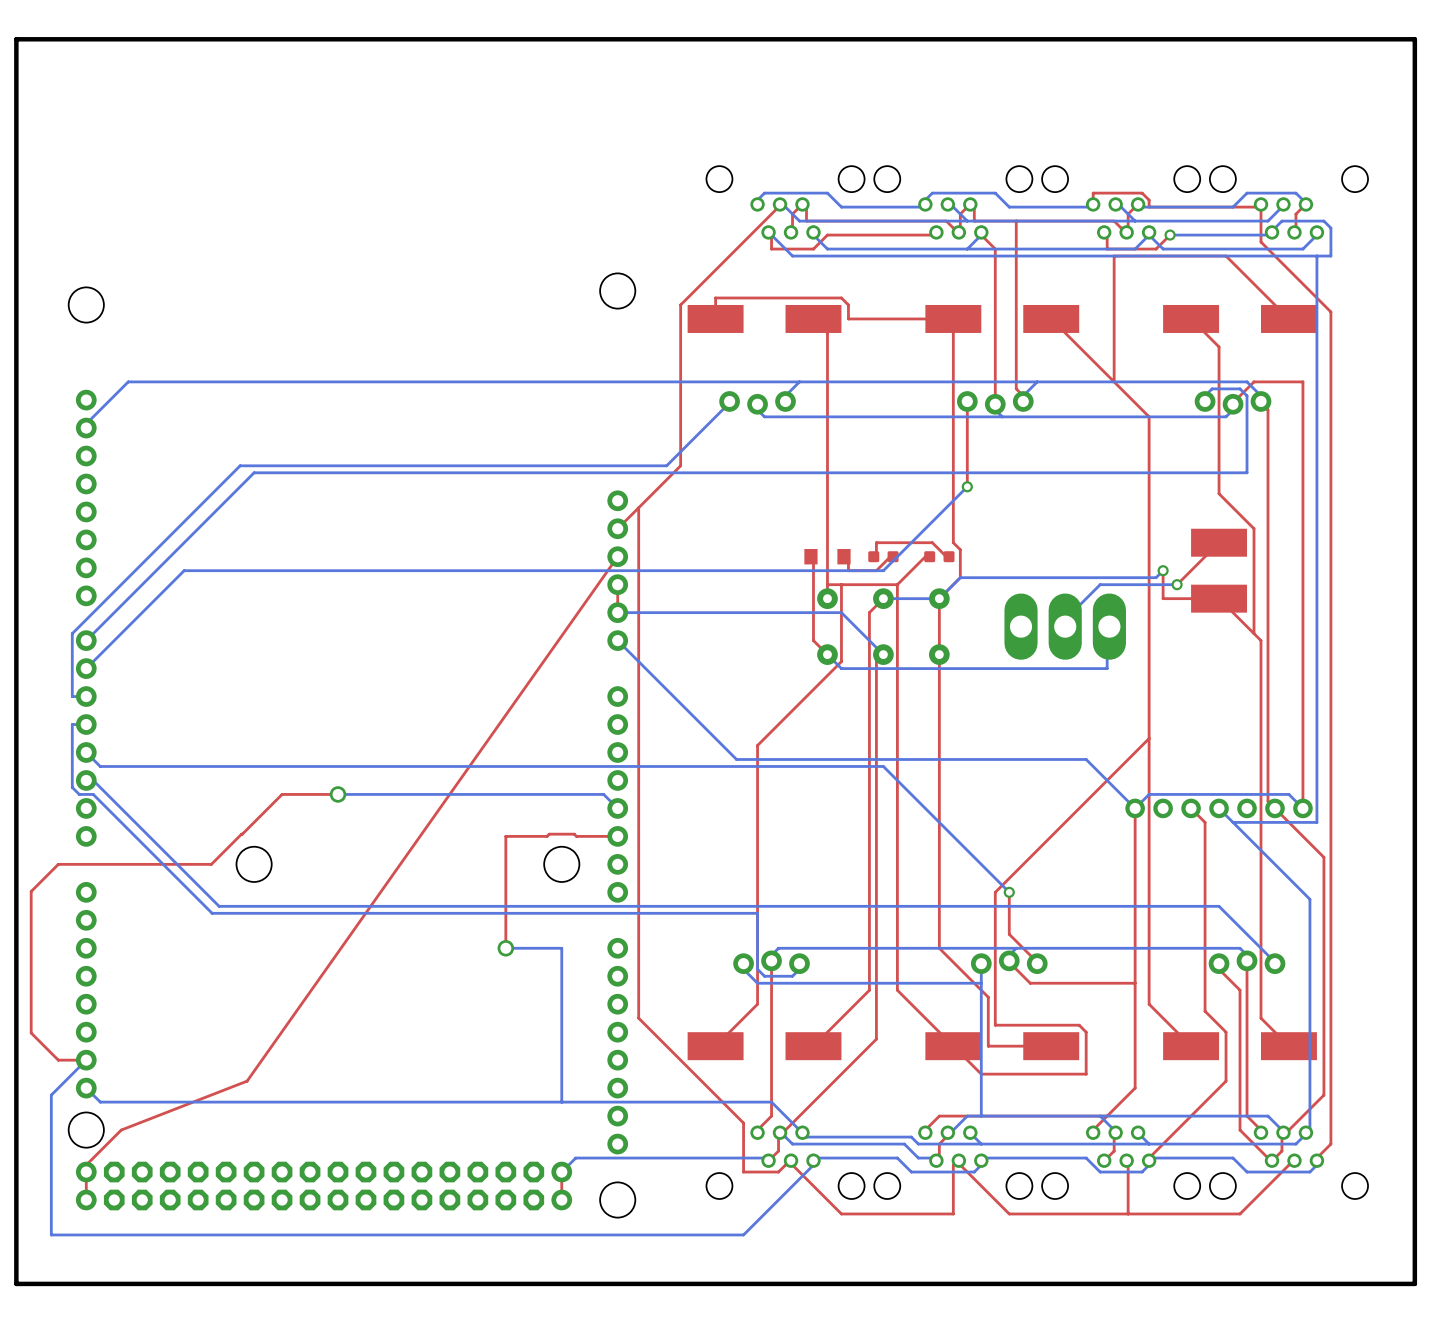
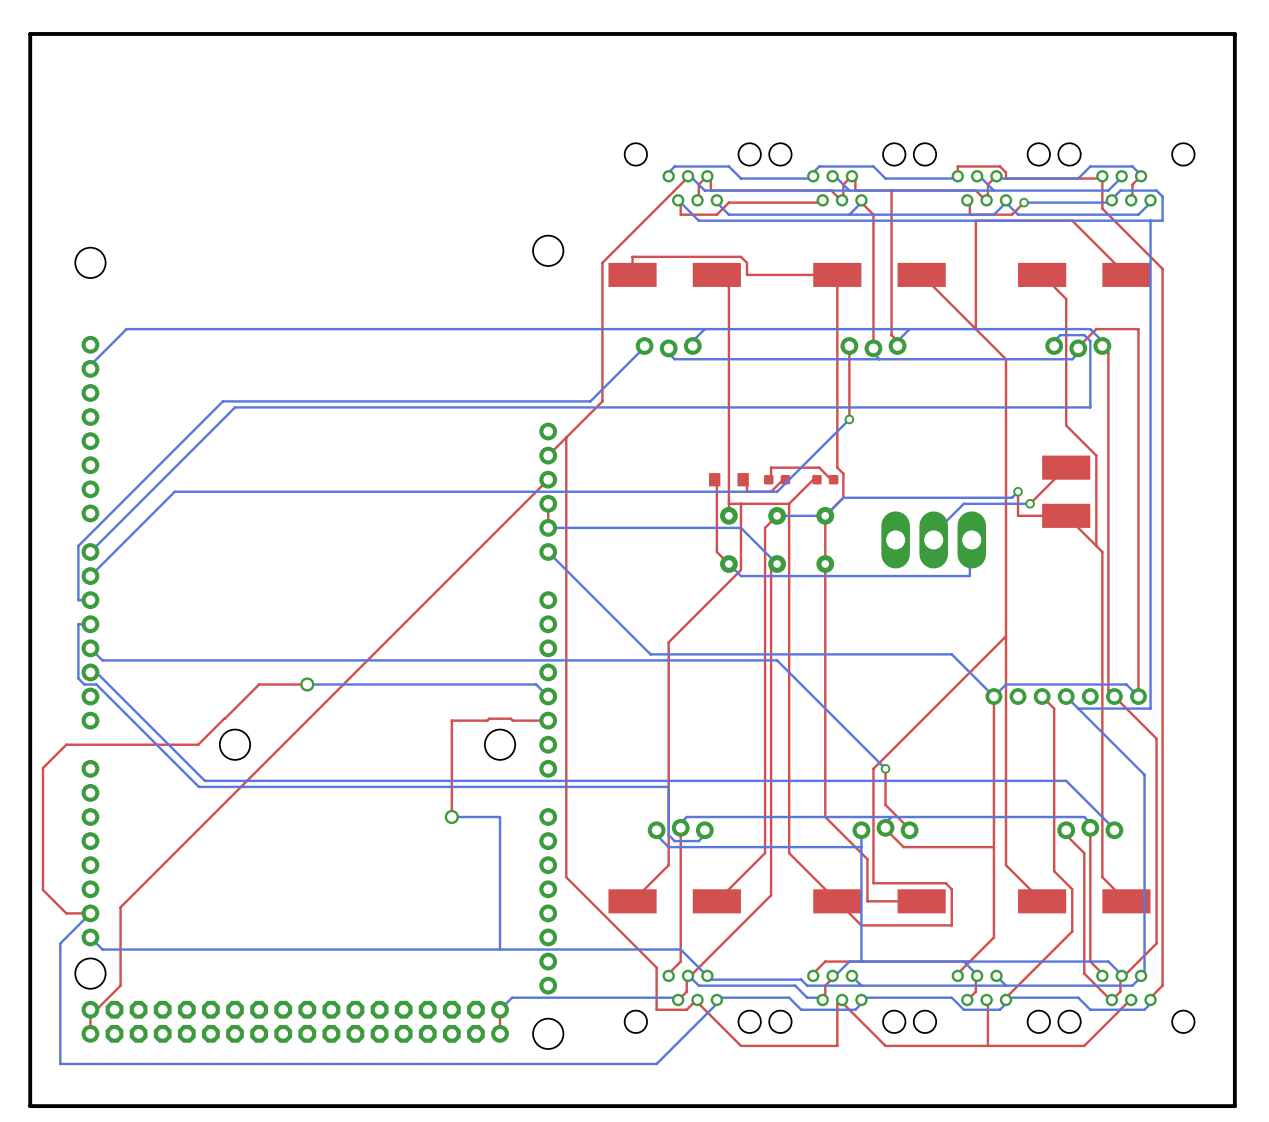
top track: (617, 556) (247, 1081) (121, 1130) (86, 1165) (86, 1172) -> (548, 479) (120, 907) (120, 985) (90, 1015)

